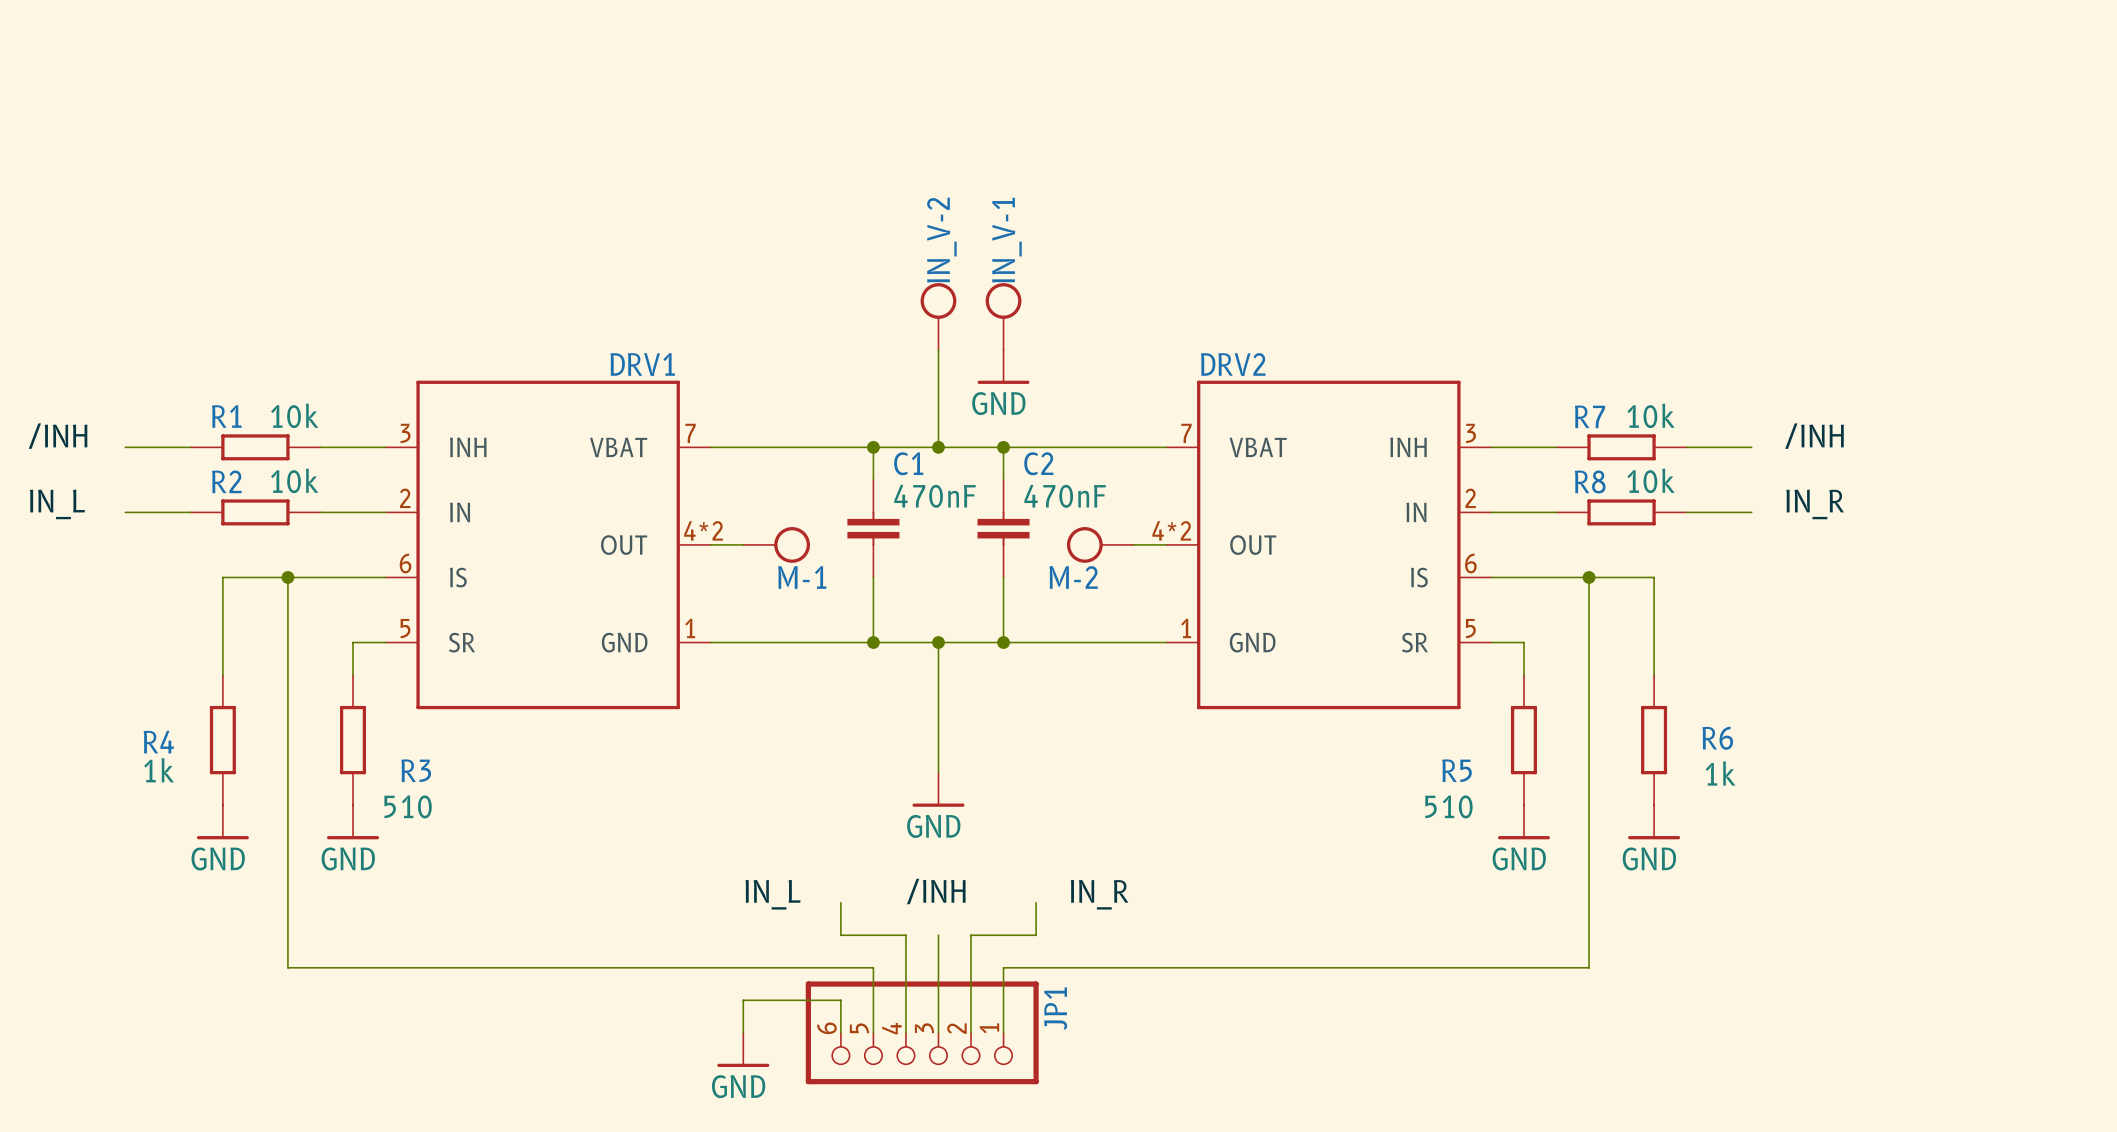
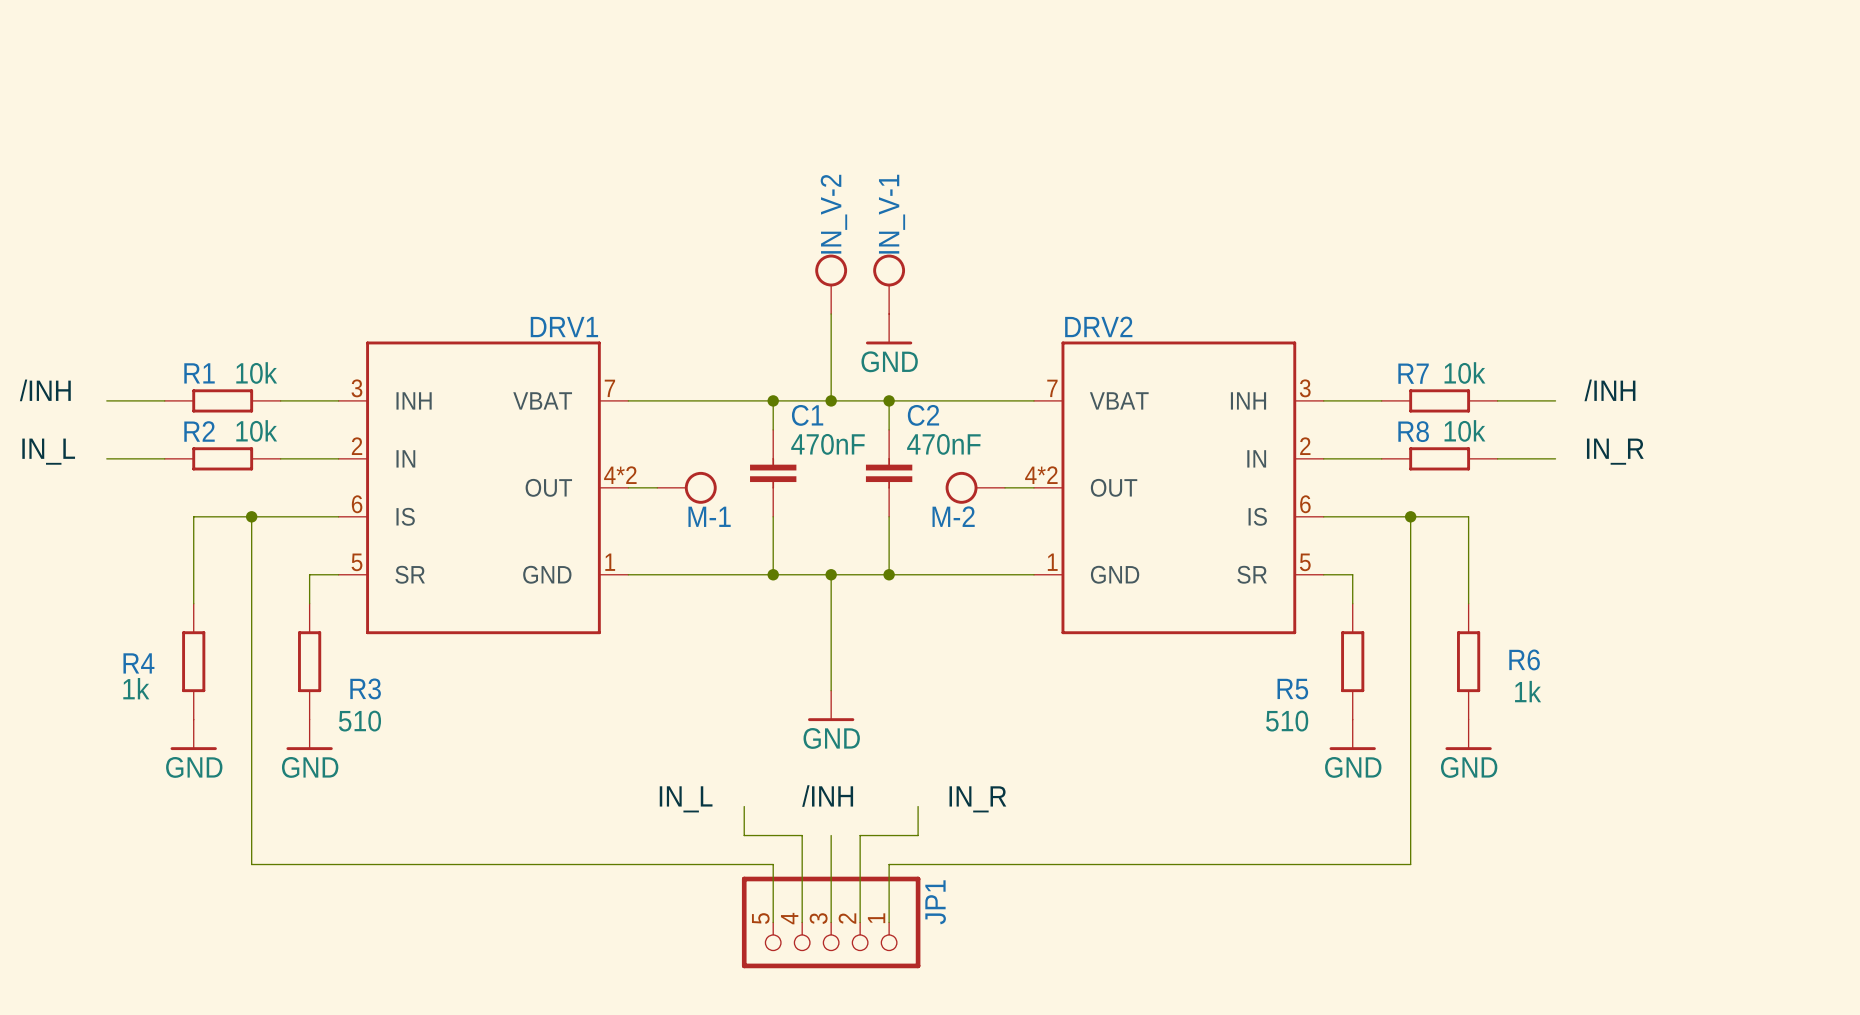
JP1 symbol: [805, 981, 1039, 1085] -> [741, 876, 921, 969]
wire: (743, 1032) (743, 1000) (840, 1000) (840, 1032) -> none
power symbol: GND (743, 1049) -> none

